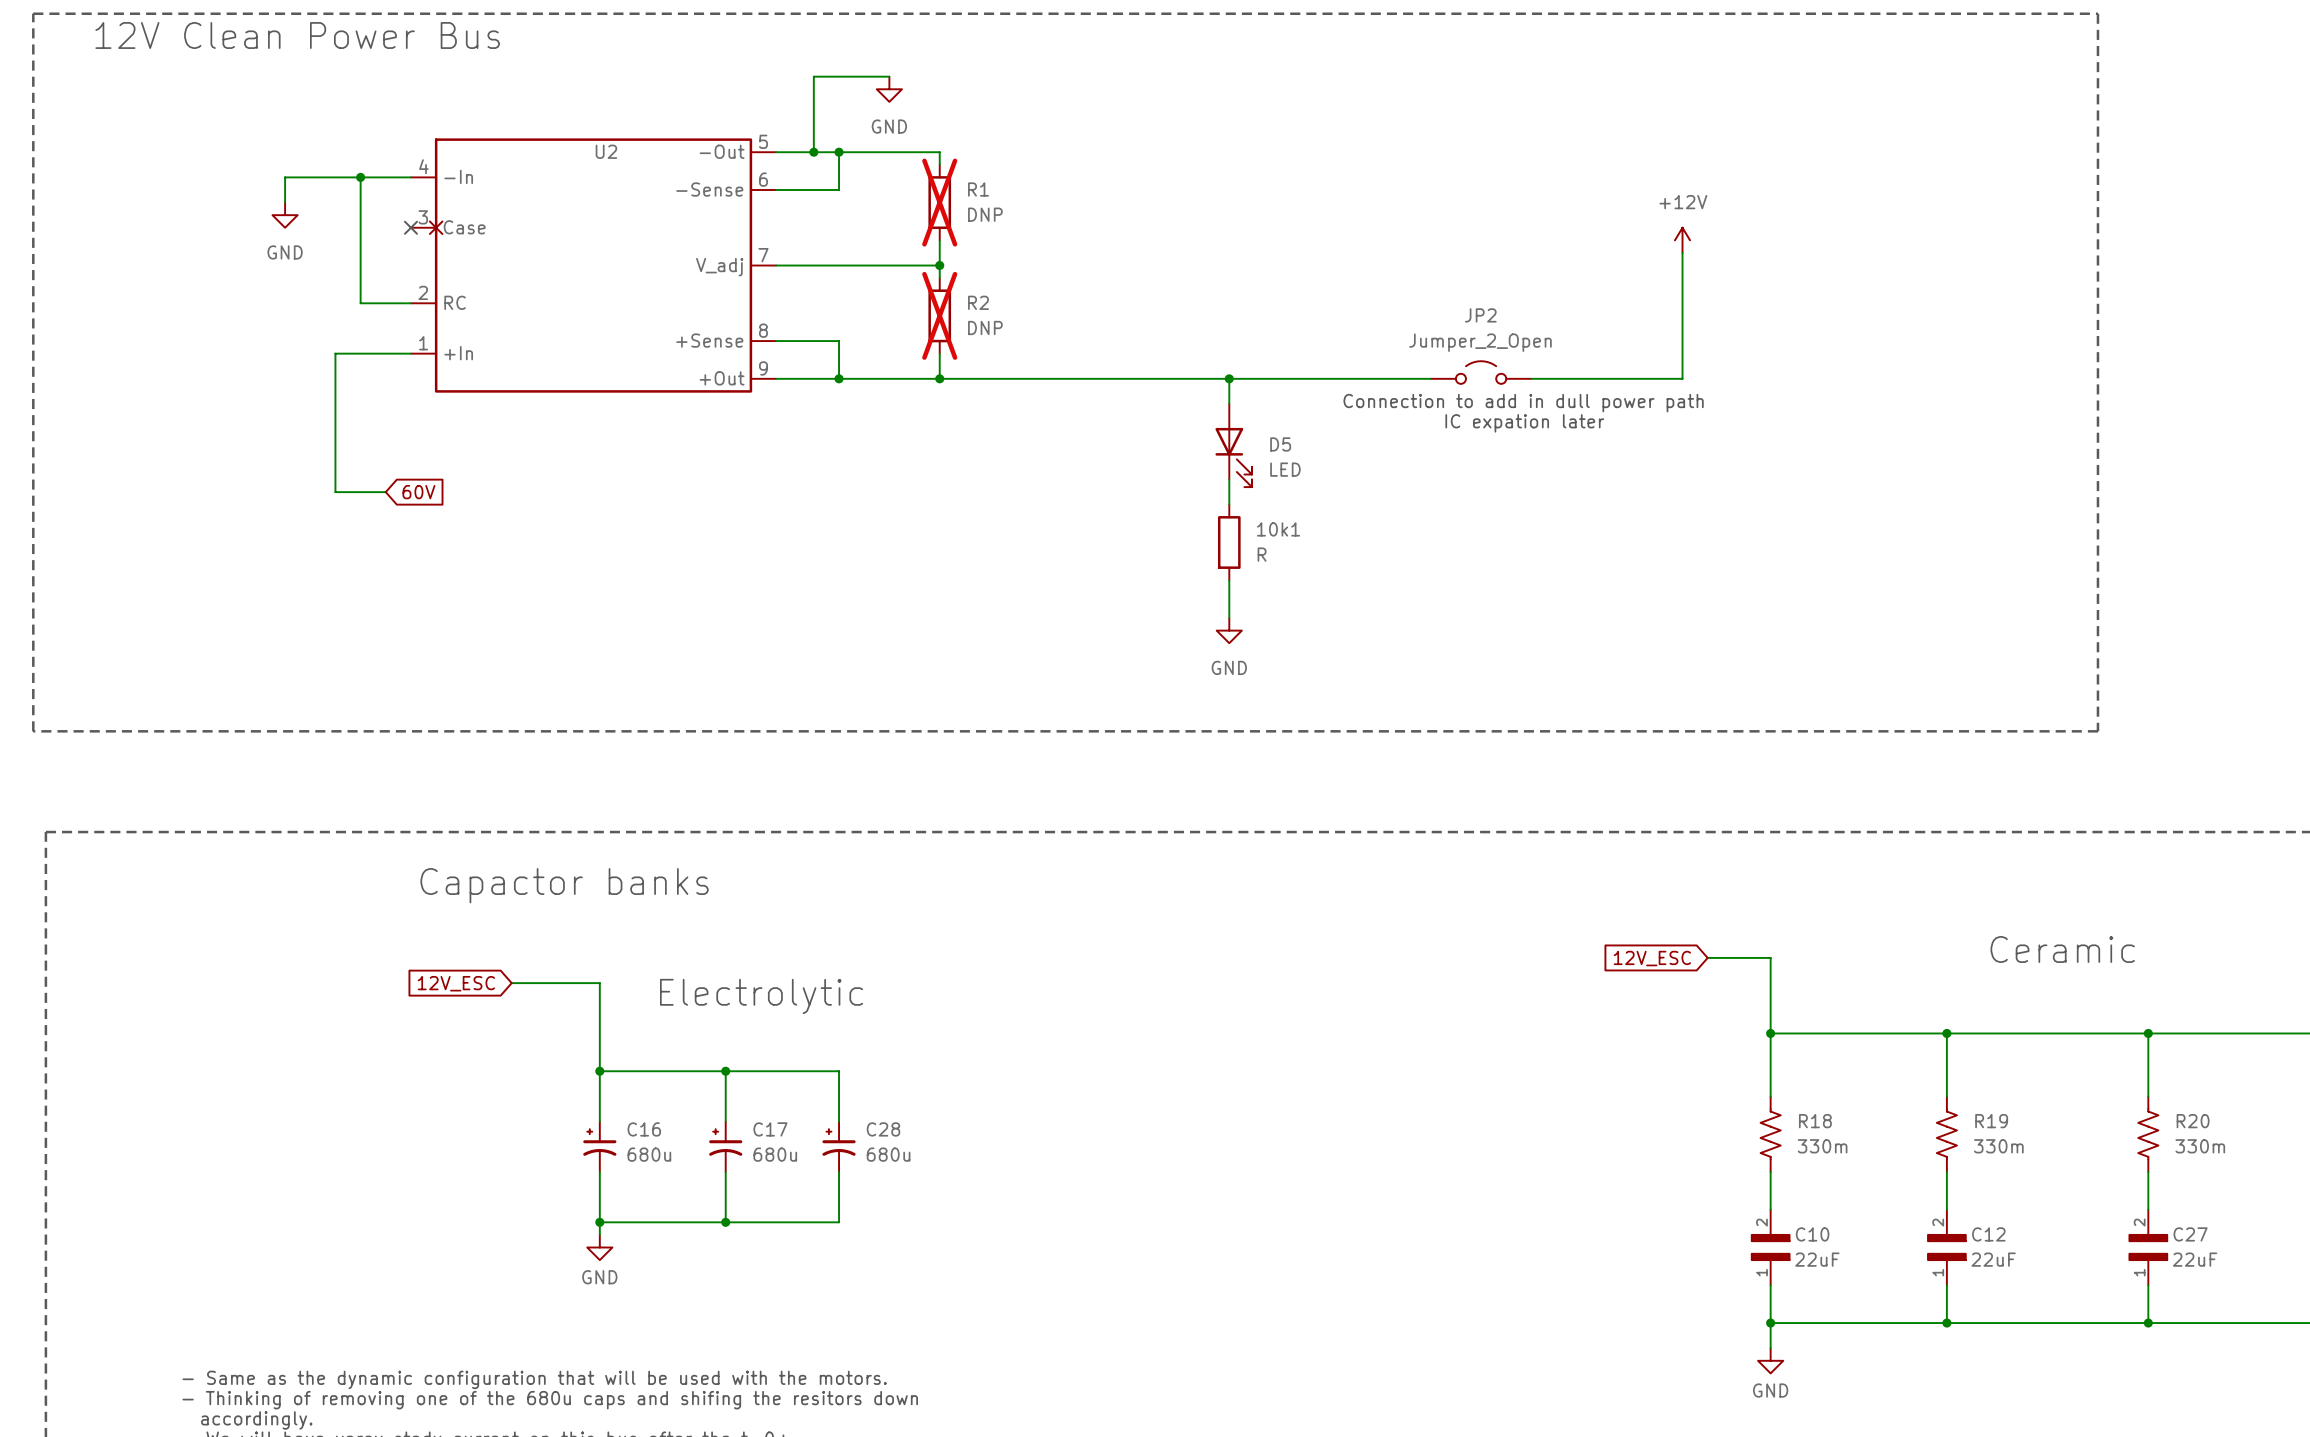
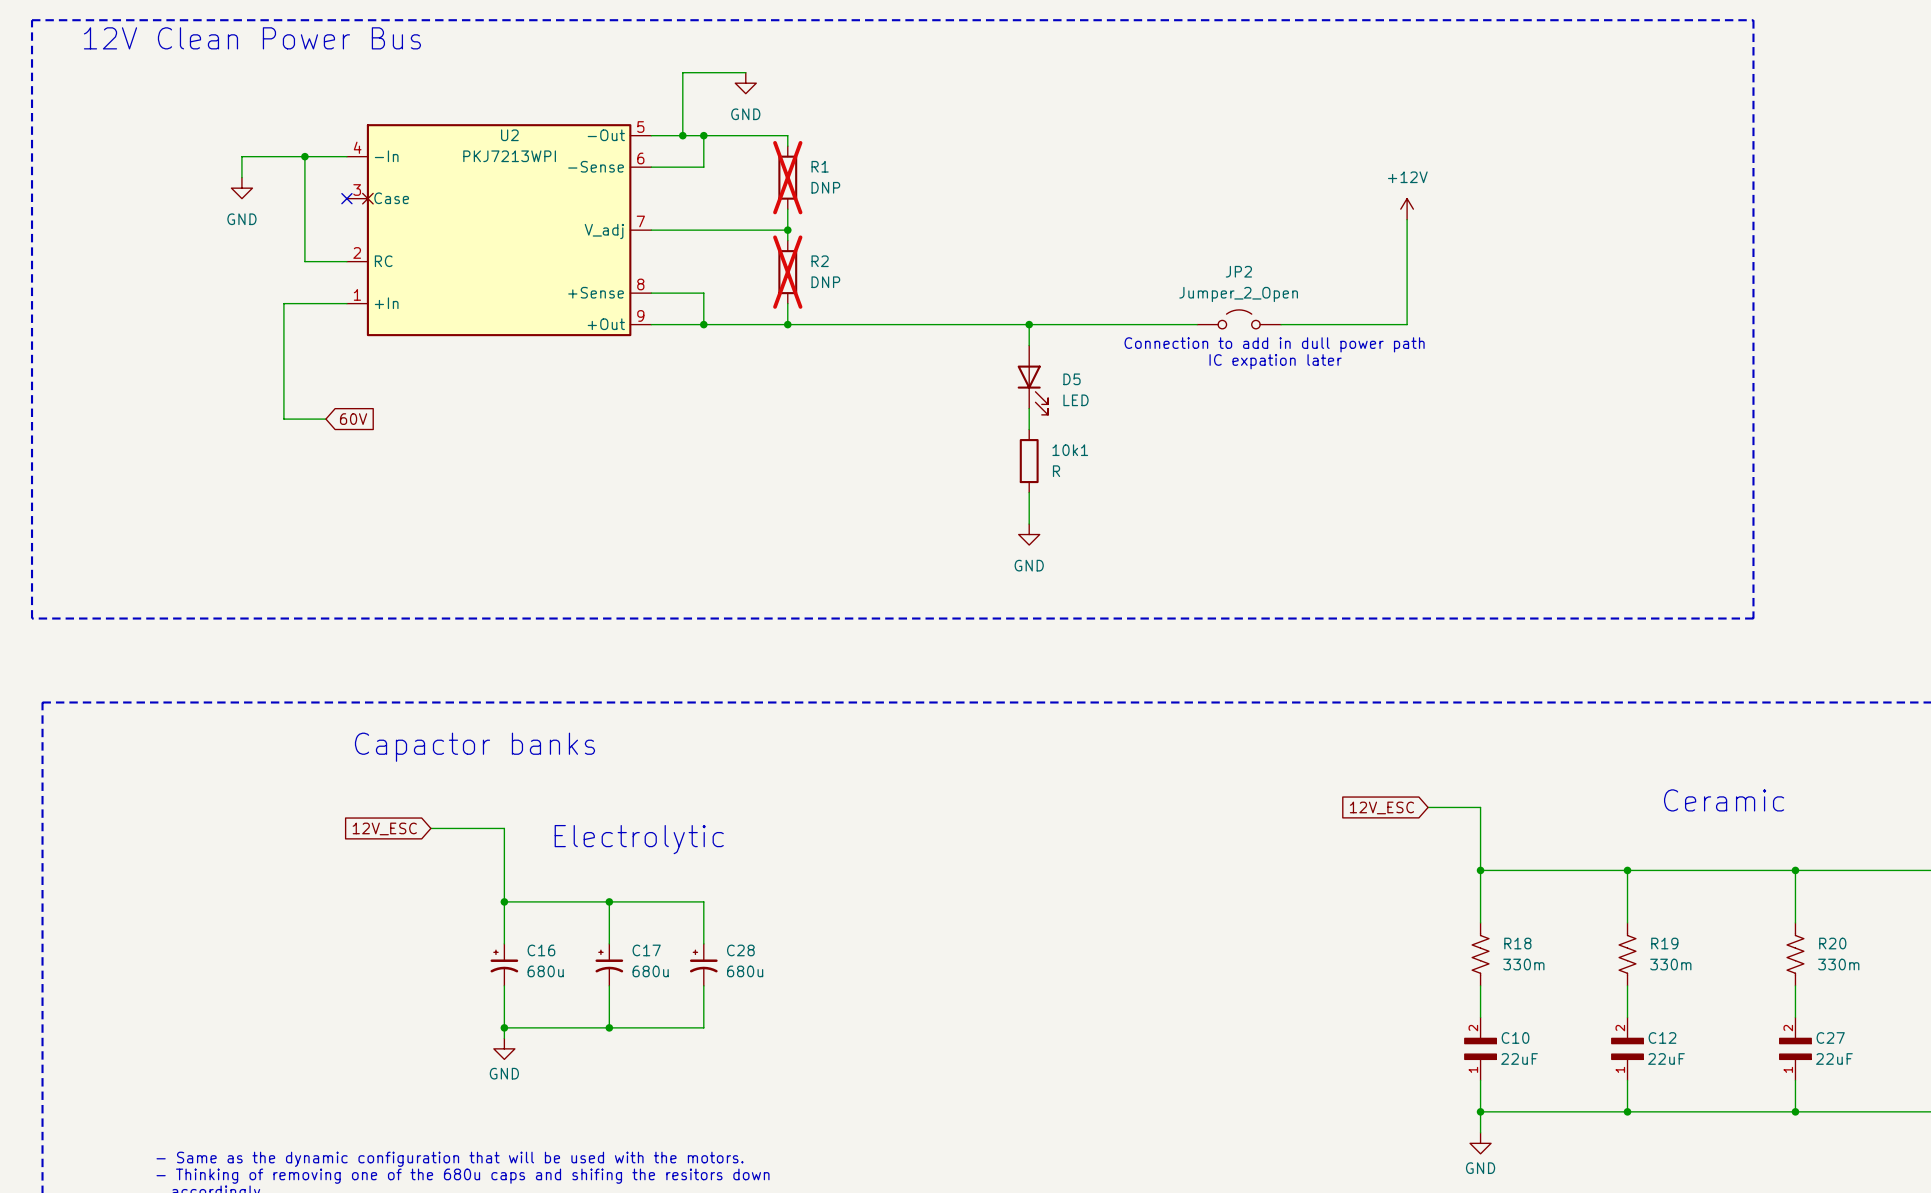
U2 value: none -> PKJ7213WPI (509, 156)

